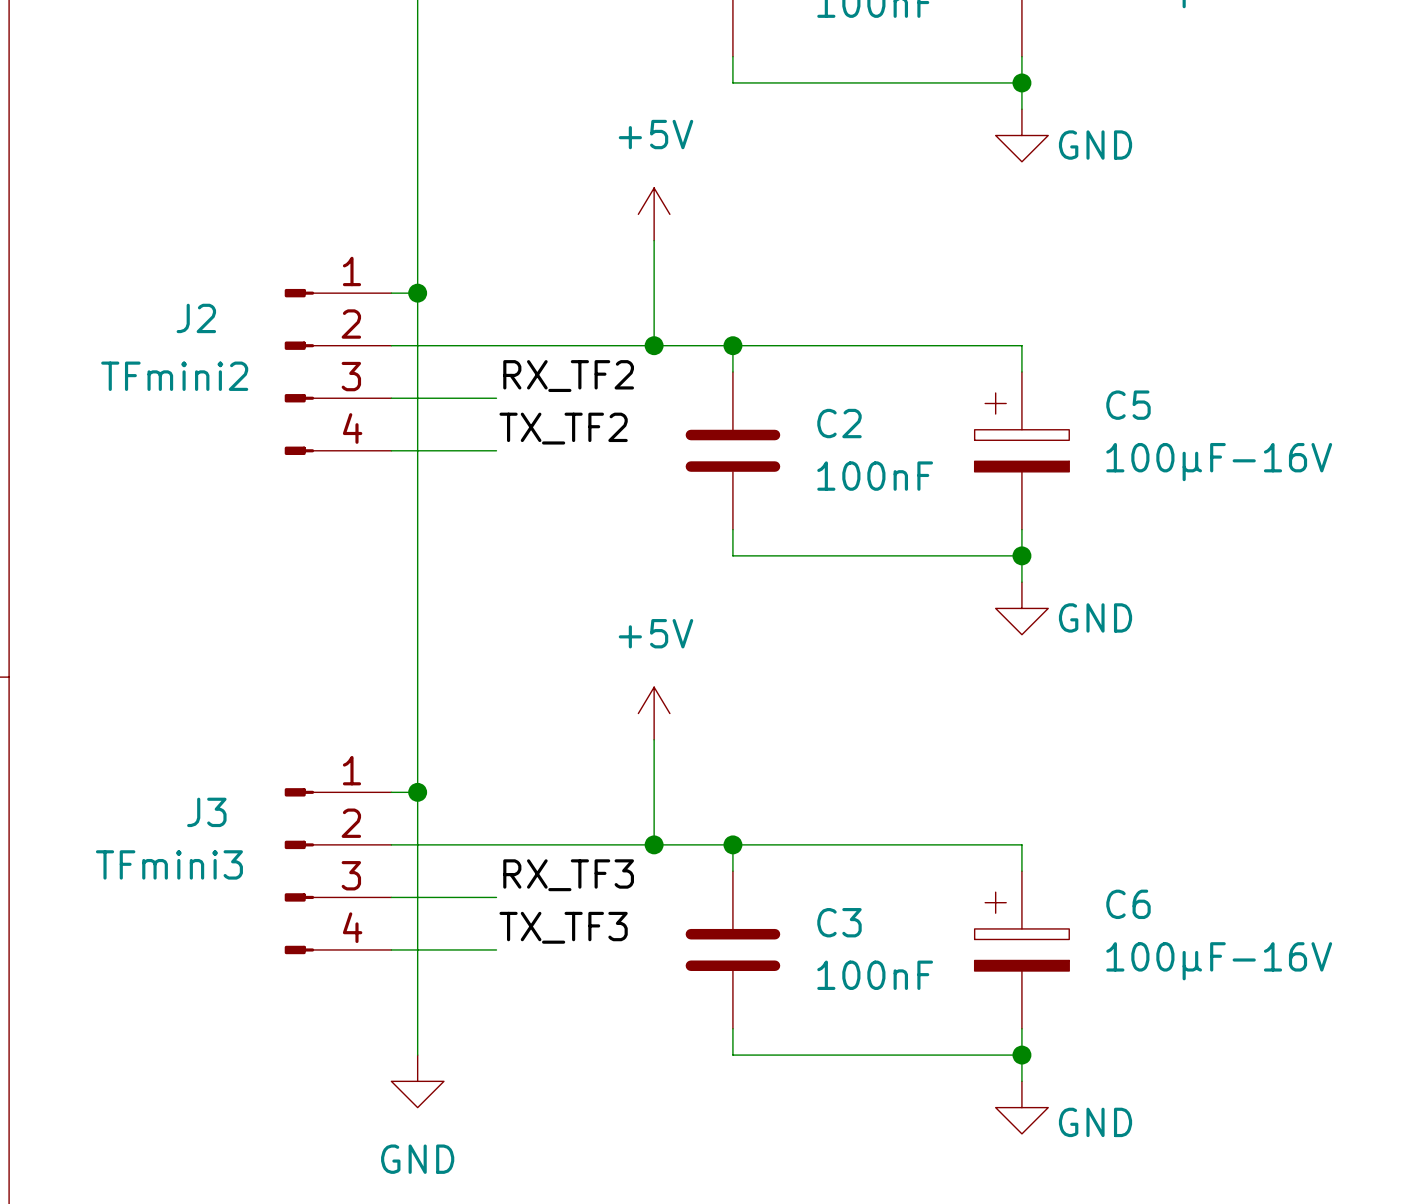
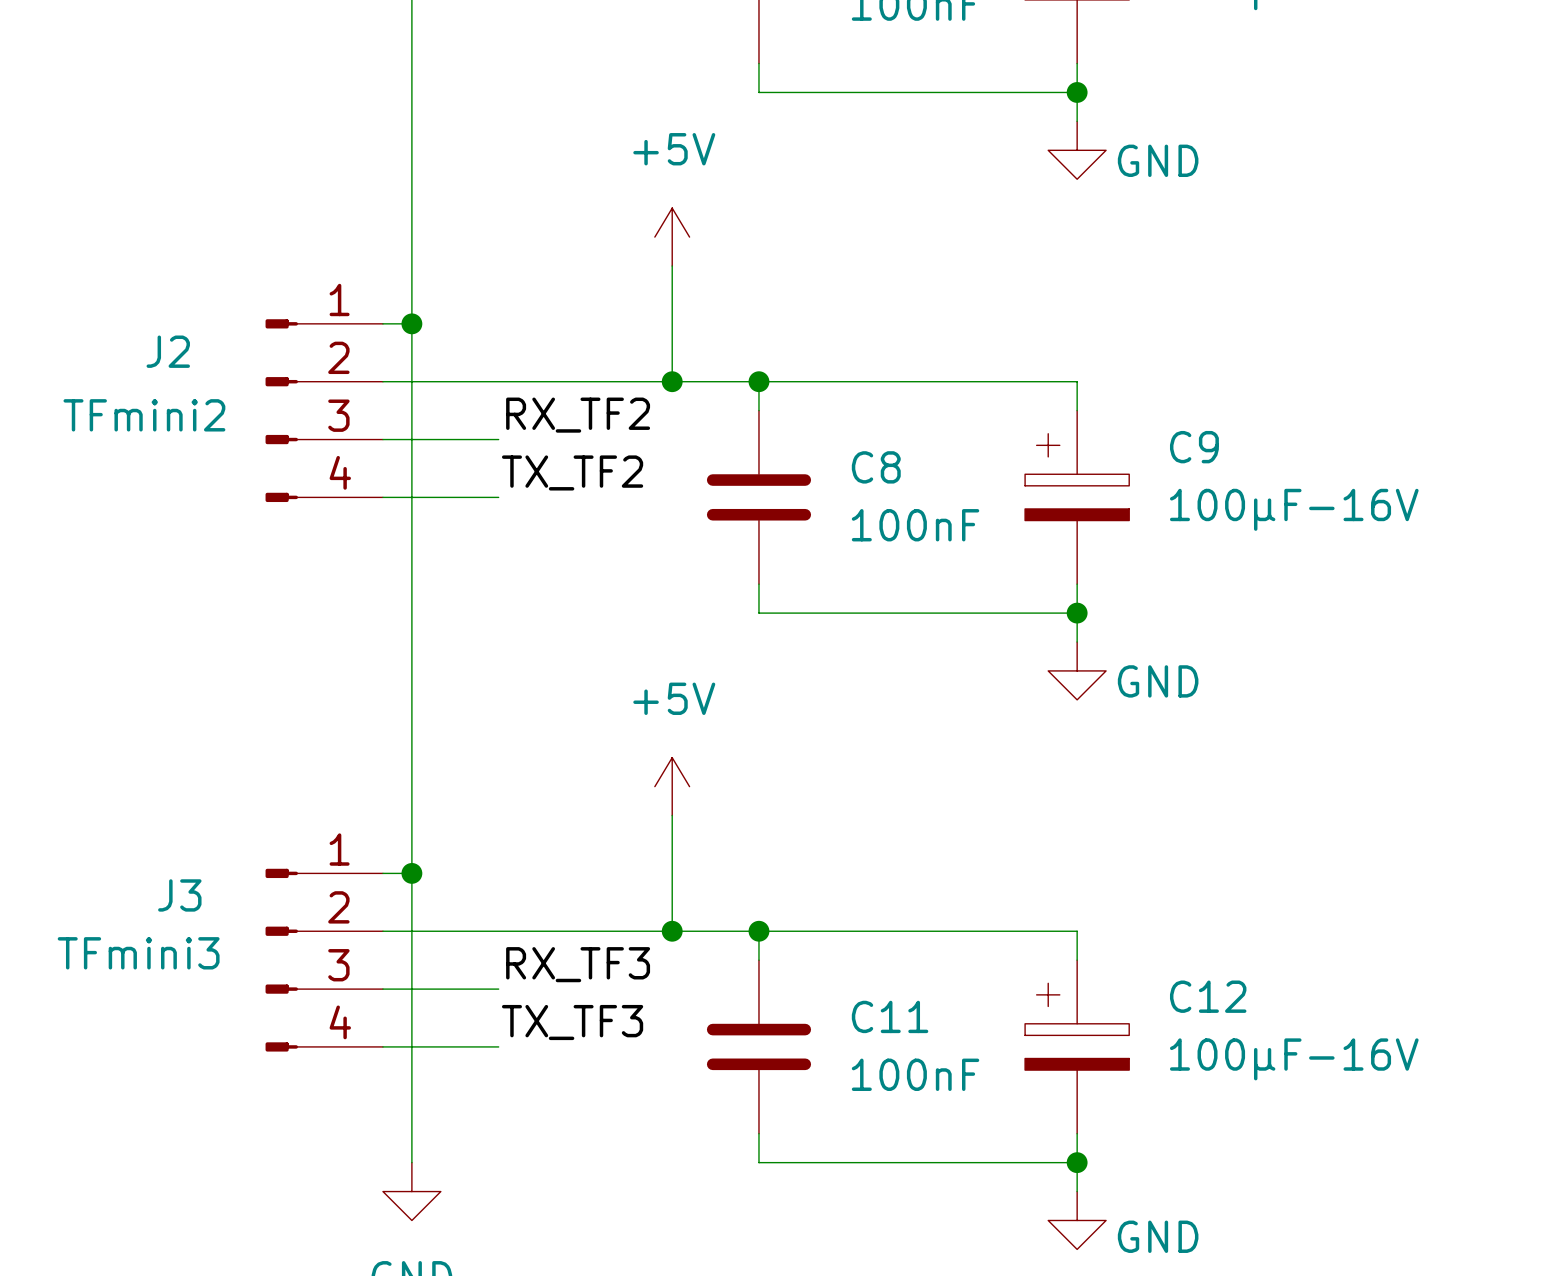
C5 name: C5 (1128, 405) -> C9 (1194, 447)
C2 name: C2 (839, 423) -> C8 (876, 467)
C6 name: C6 (1128, 904) -> C12 (1208, 996)
C3 name: C3 (839, 922) -> C11 (890, 1016)

